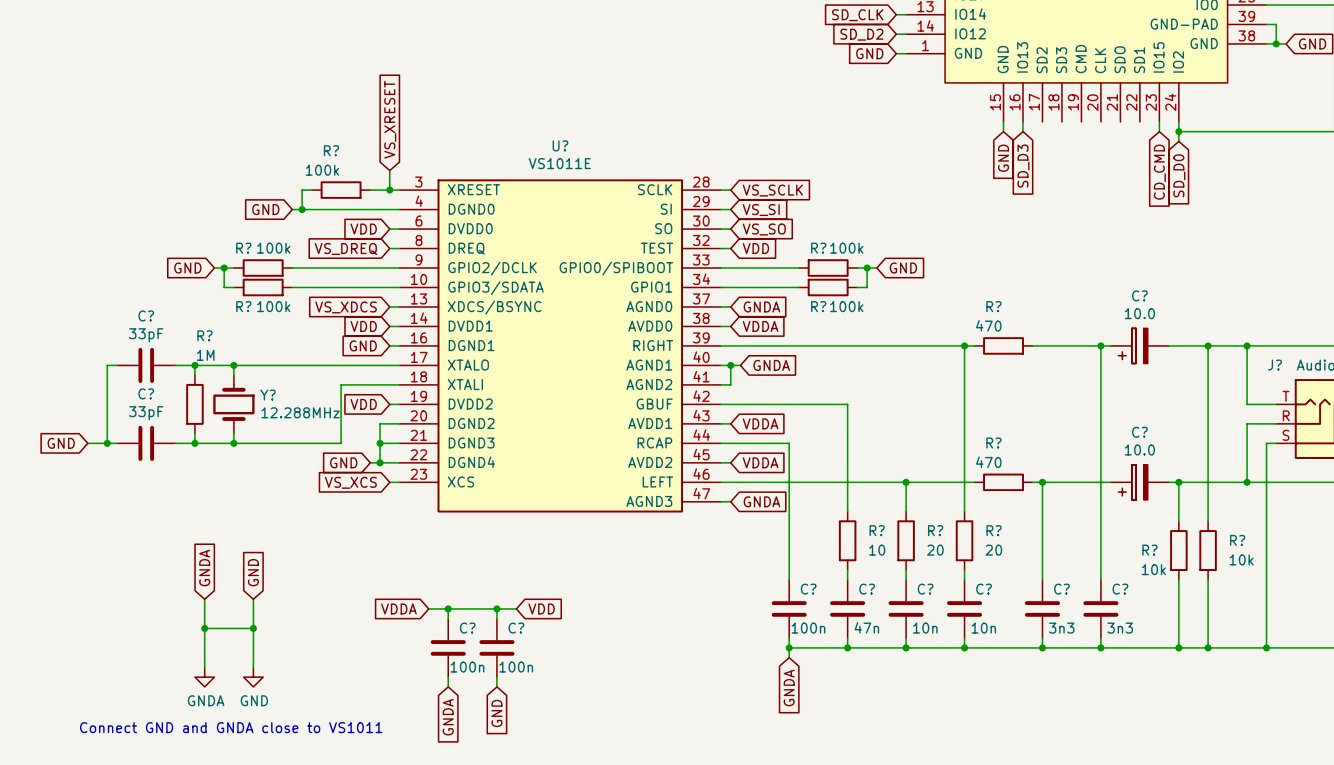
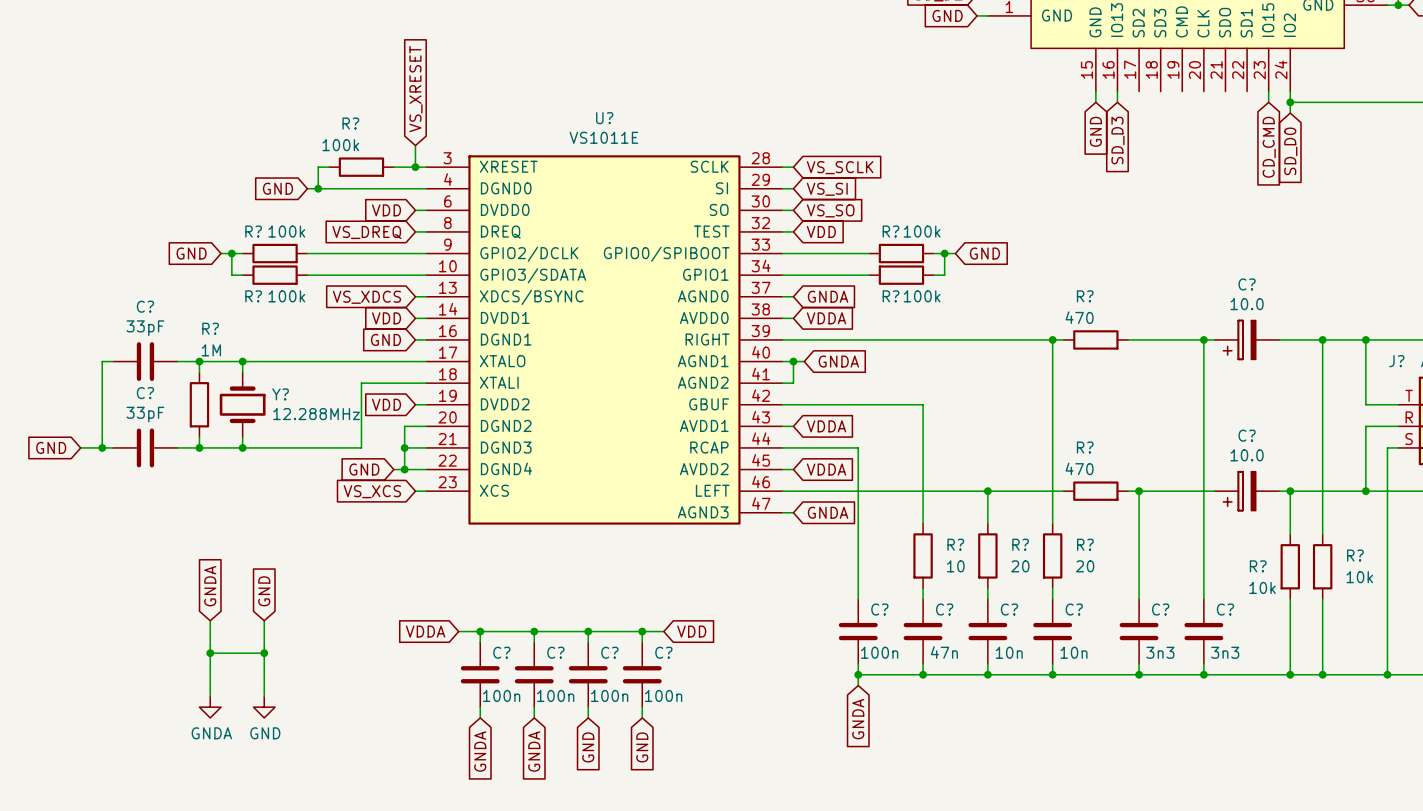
wire: none -> (555, 631) (663, 631)
global label position: VDD (541, 608) -> VDD (691, 631)
wire: none -> (588, 631) (588, 642)
junction: none -> (588, 631)
wire: none -> (642, 631) (642, 642)
junction: none -> (642, 631)
C?: none -> 100n (588, 674)
C?: none -> 100n (642, 674)
wire: none -> (588, 707) (588, 717)
wire: none -> (642, 707) (642, 717)
global label: GND (496, 713) -> GNDA (534, 751)
global label: none -> GND (588, 747)
global label: none -> GND (642, 747)
text: Connect GND and GNDA close to VS1011 (231, 727) -> none

